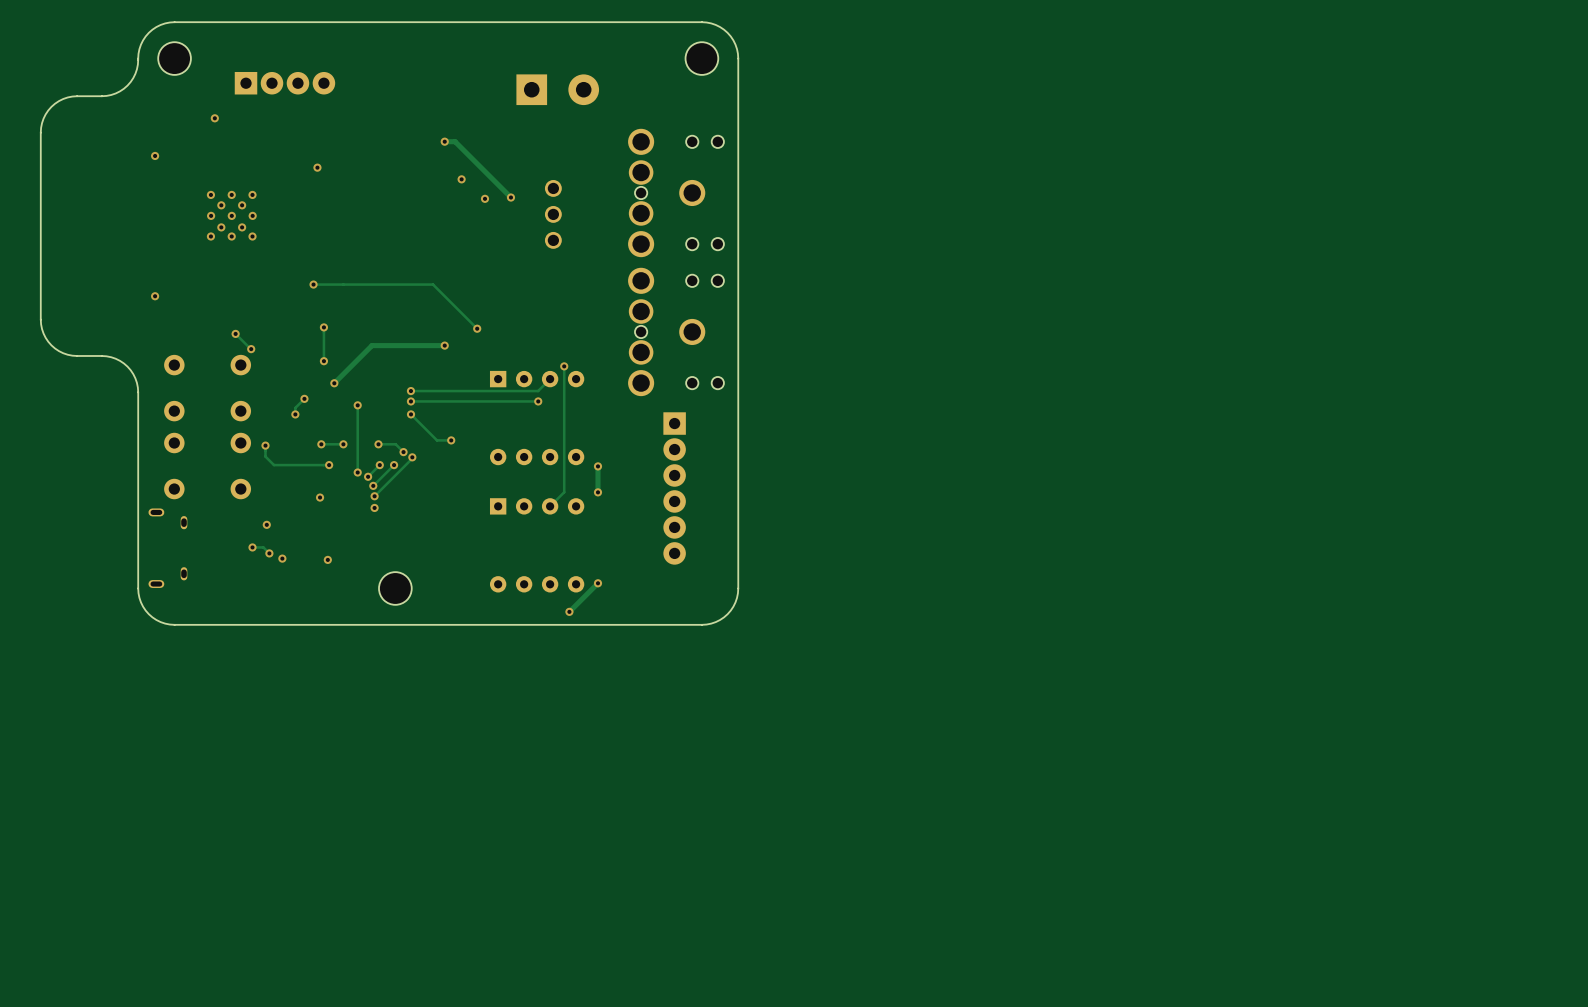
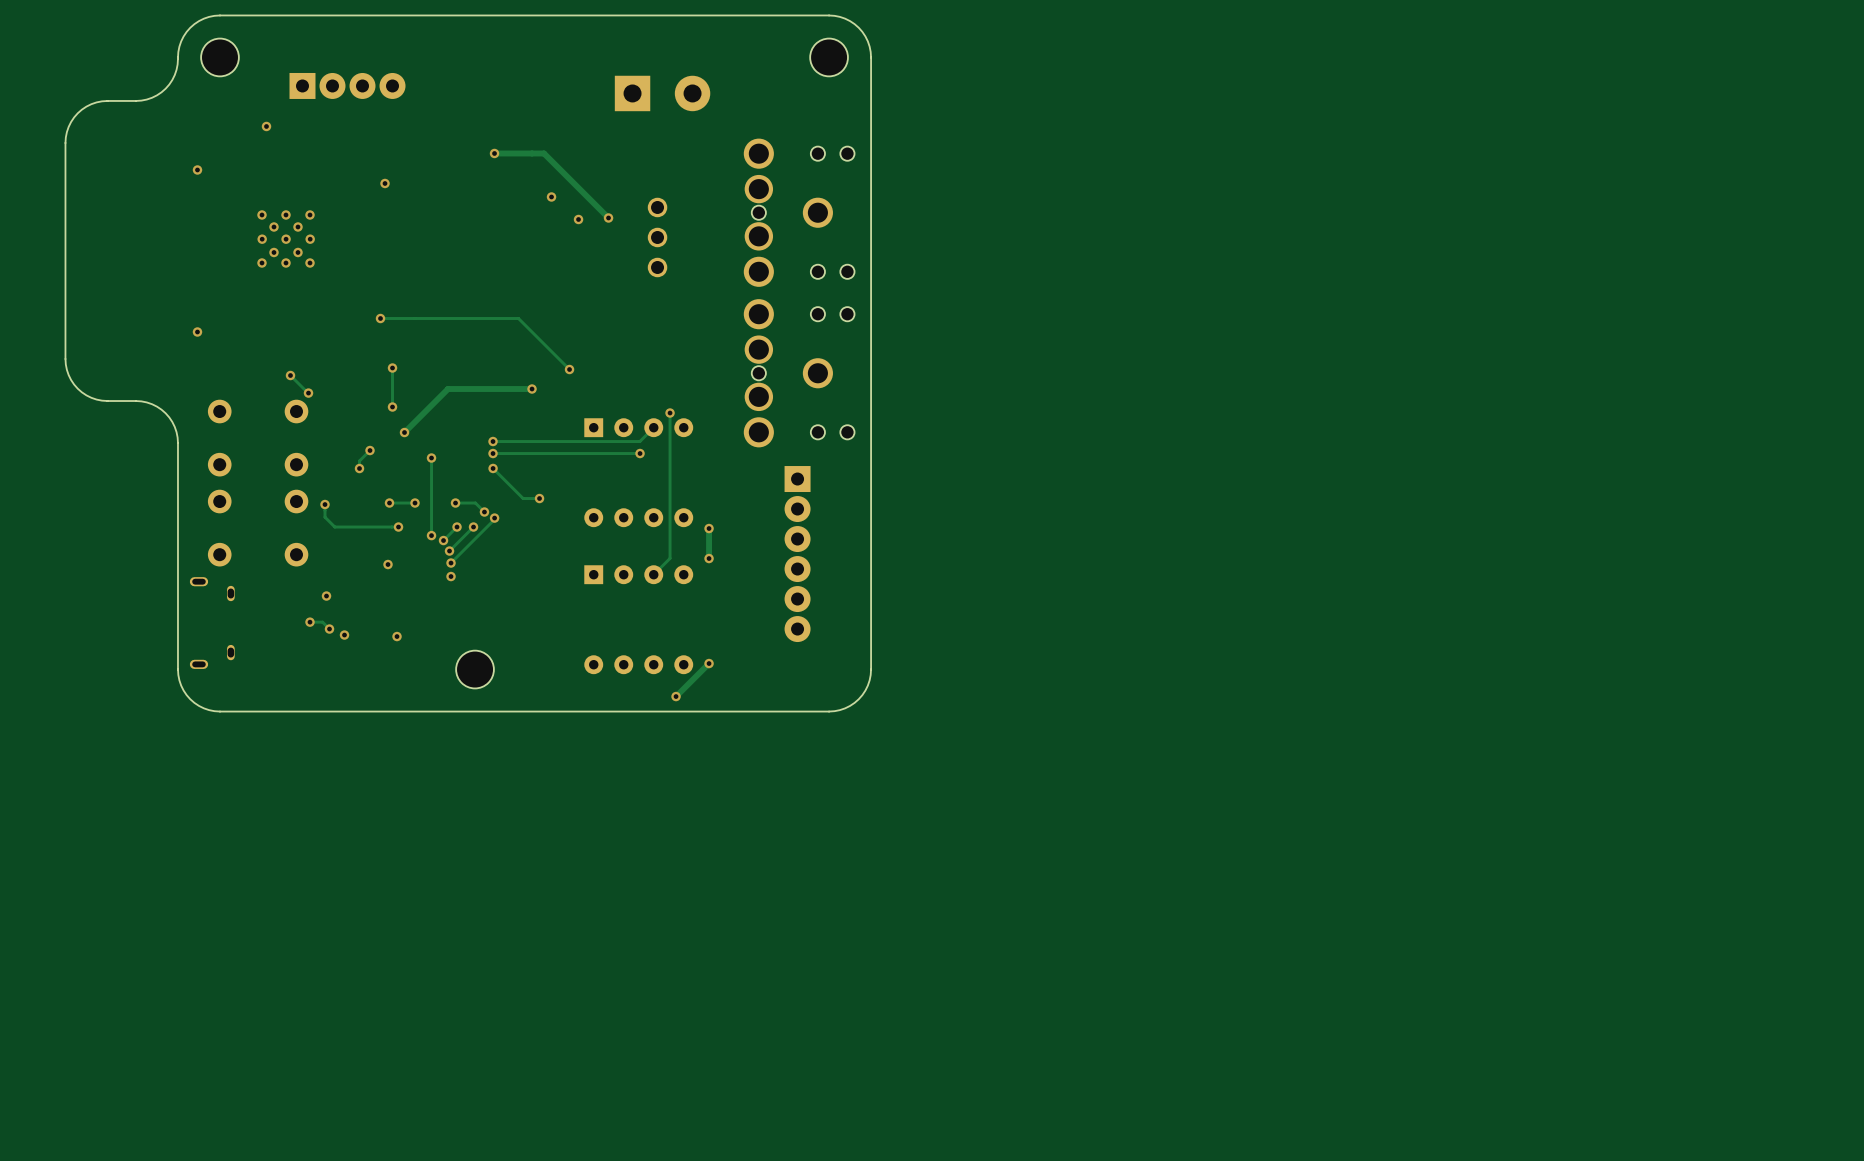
track: none -> (532, 153) (494, 153)
via position: (444, 141) -> (494, 153)

